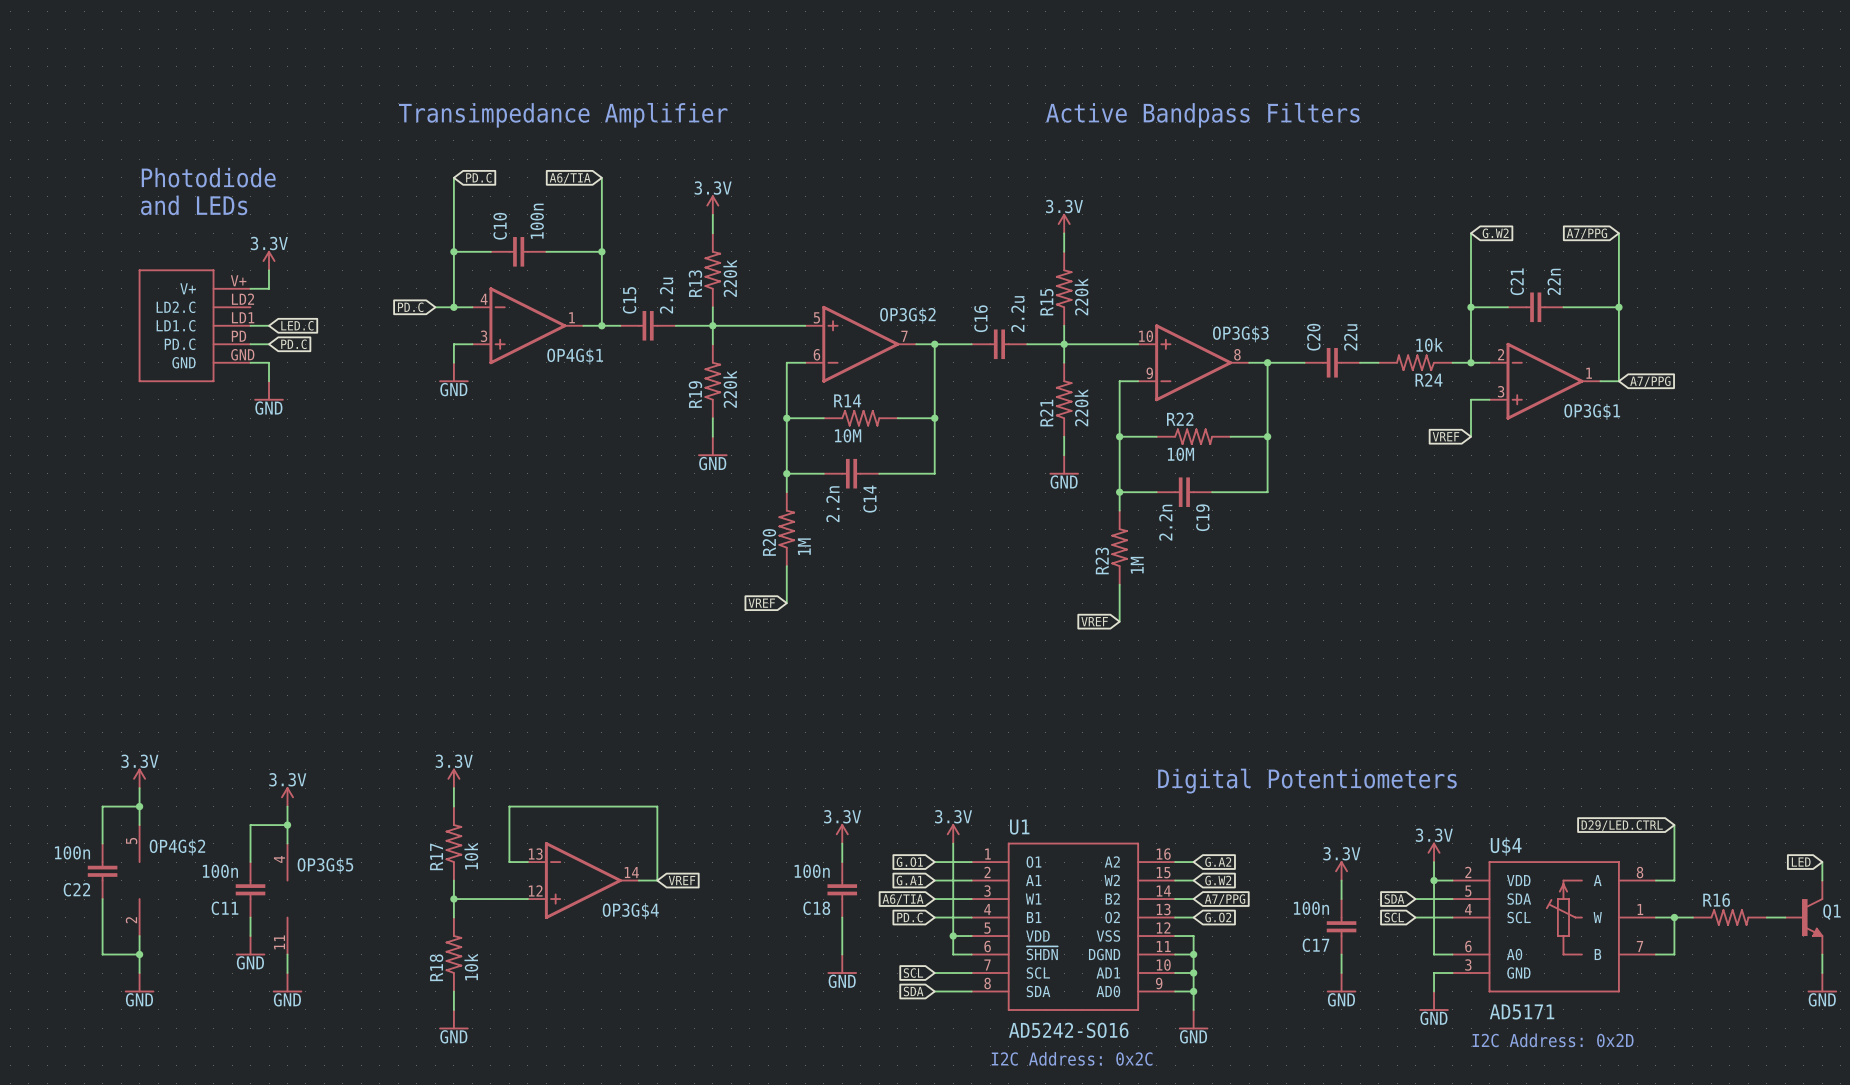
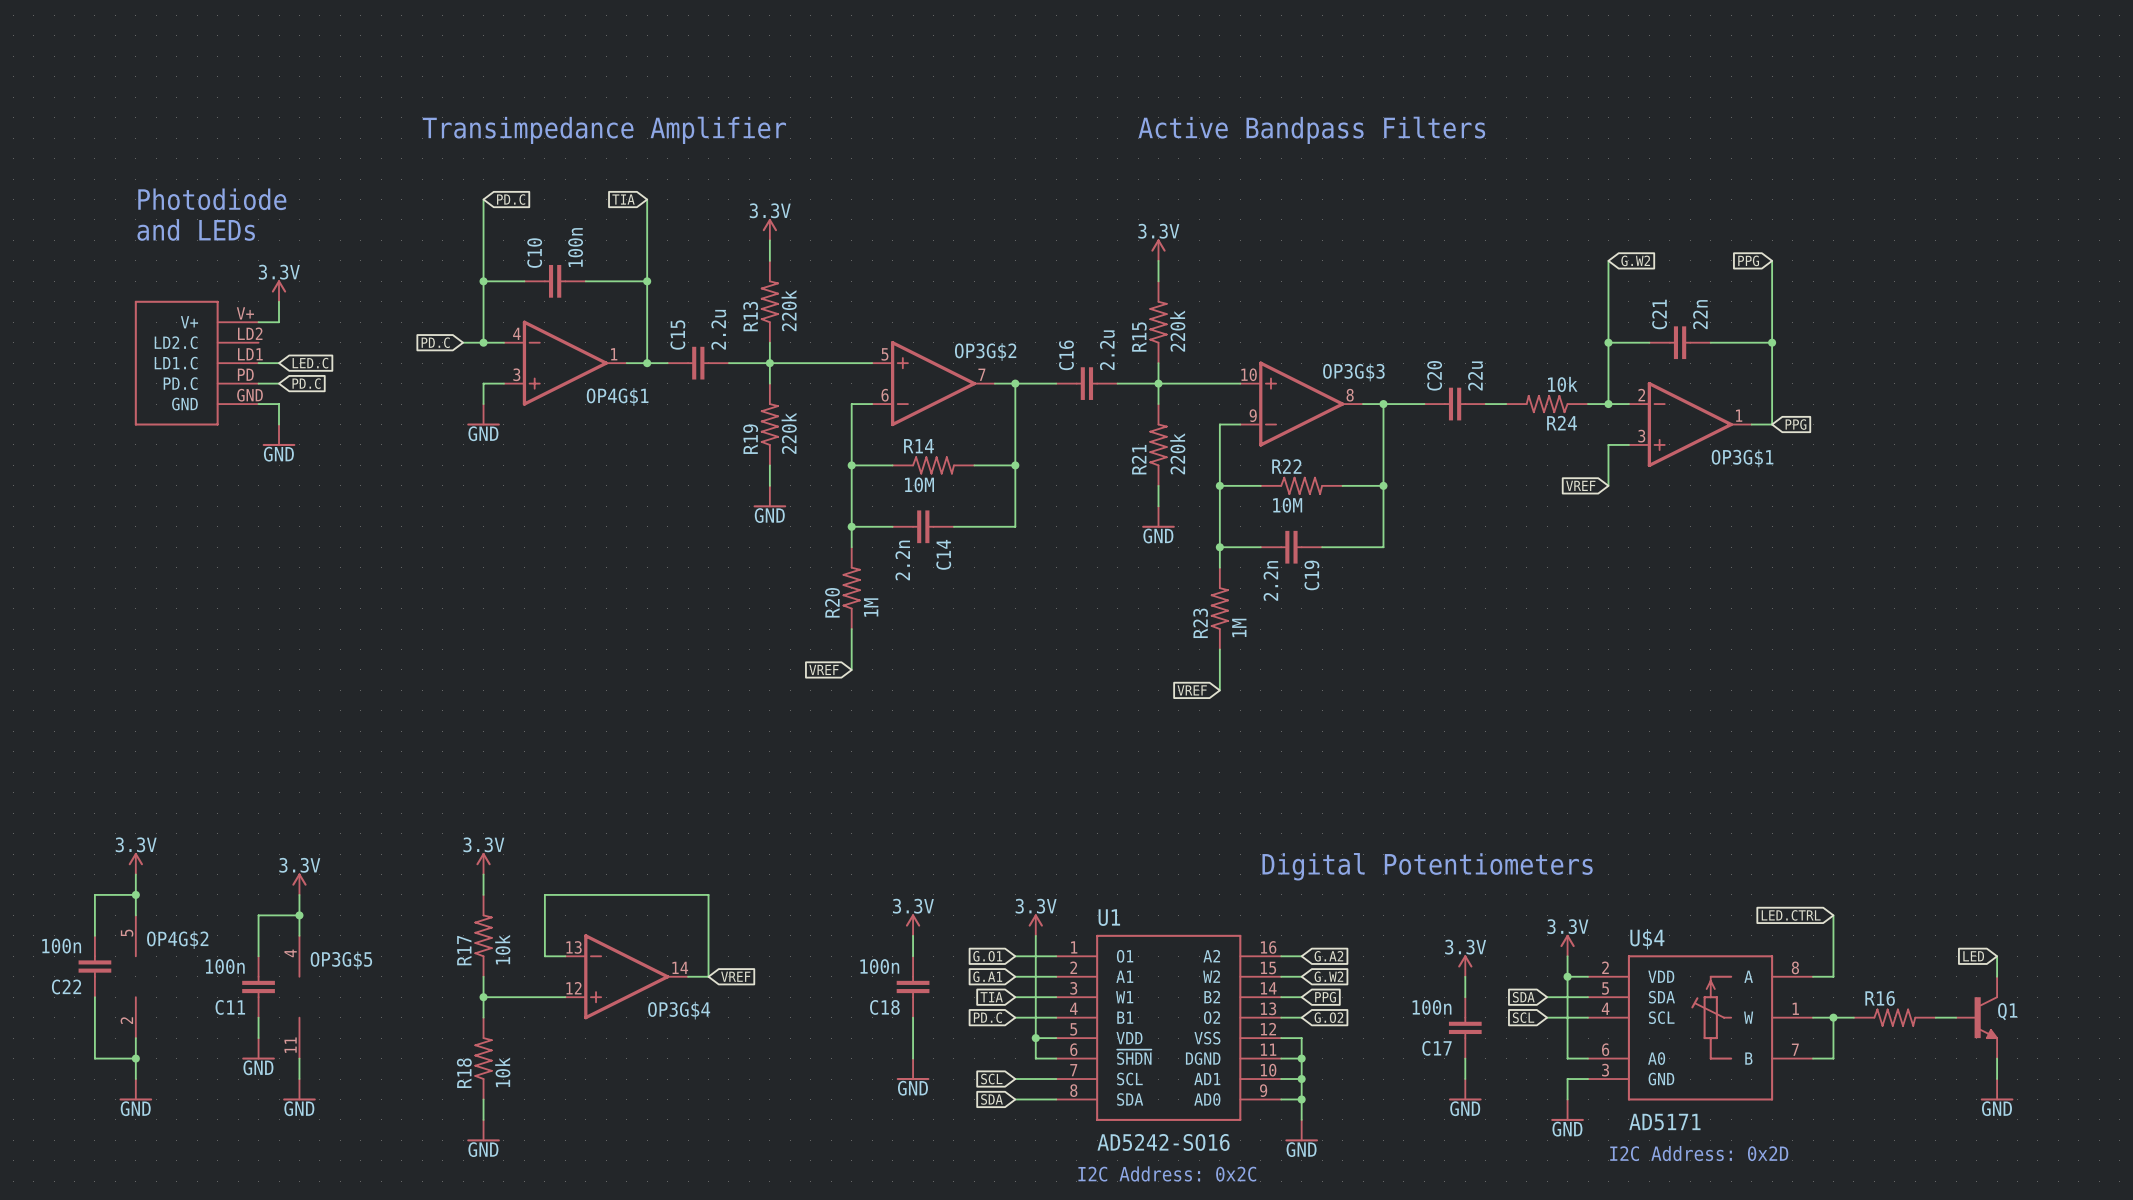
global label: A6/TIA (570, 178) -> TIA (623, 199)
global label: A7/PPG (1586, 233) -> PPG (1748, 260)
global label: A7/PPG (1650, 381) -> PPG (1795, 424)
global label: D29/LED.CTRL (1622, 825) -> LED.CTRL (1791, 915)
global label: A6/TIA (903, 899) -> TIA (991, 997)
global label: A7/PPG (1225, 899) -> PPG (1325, 997)

